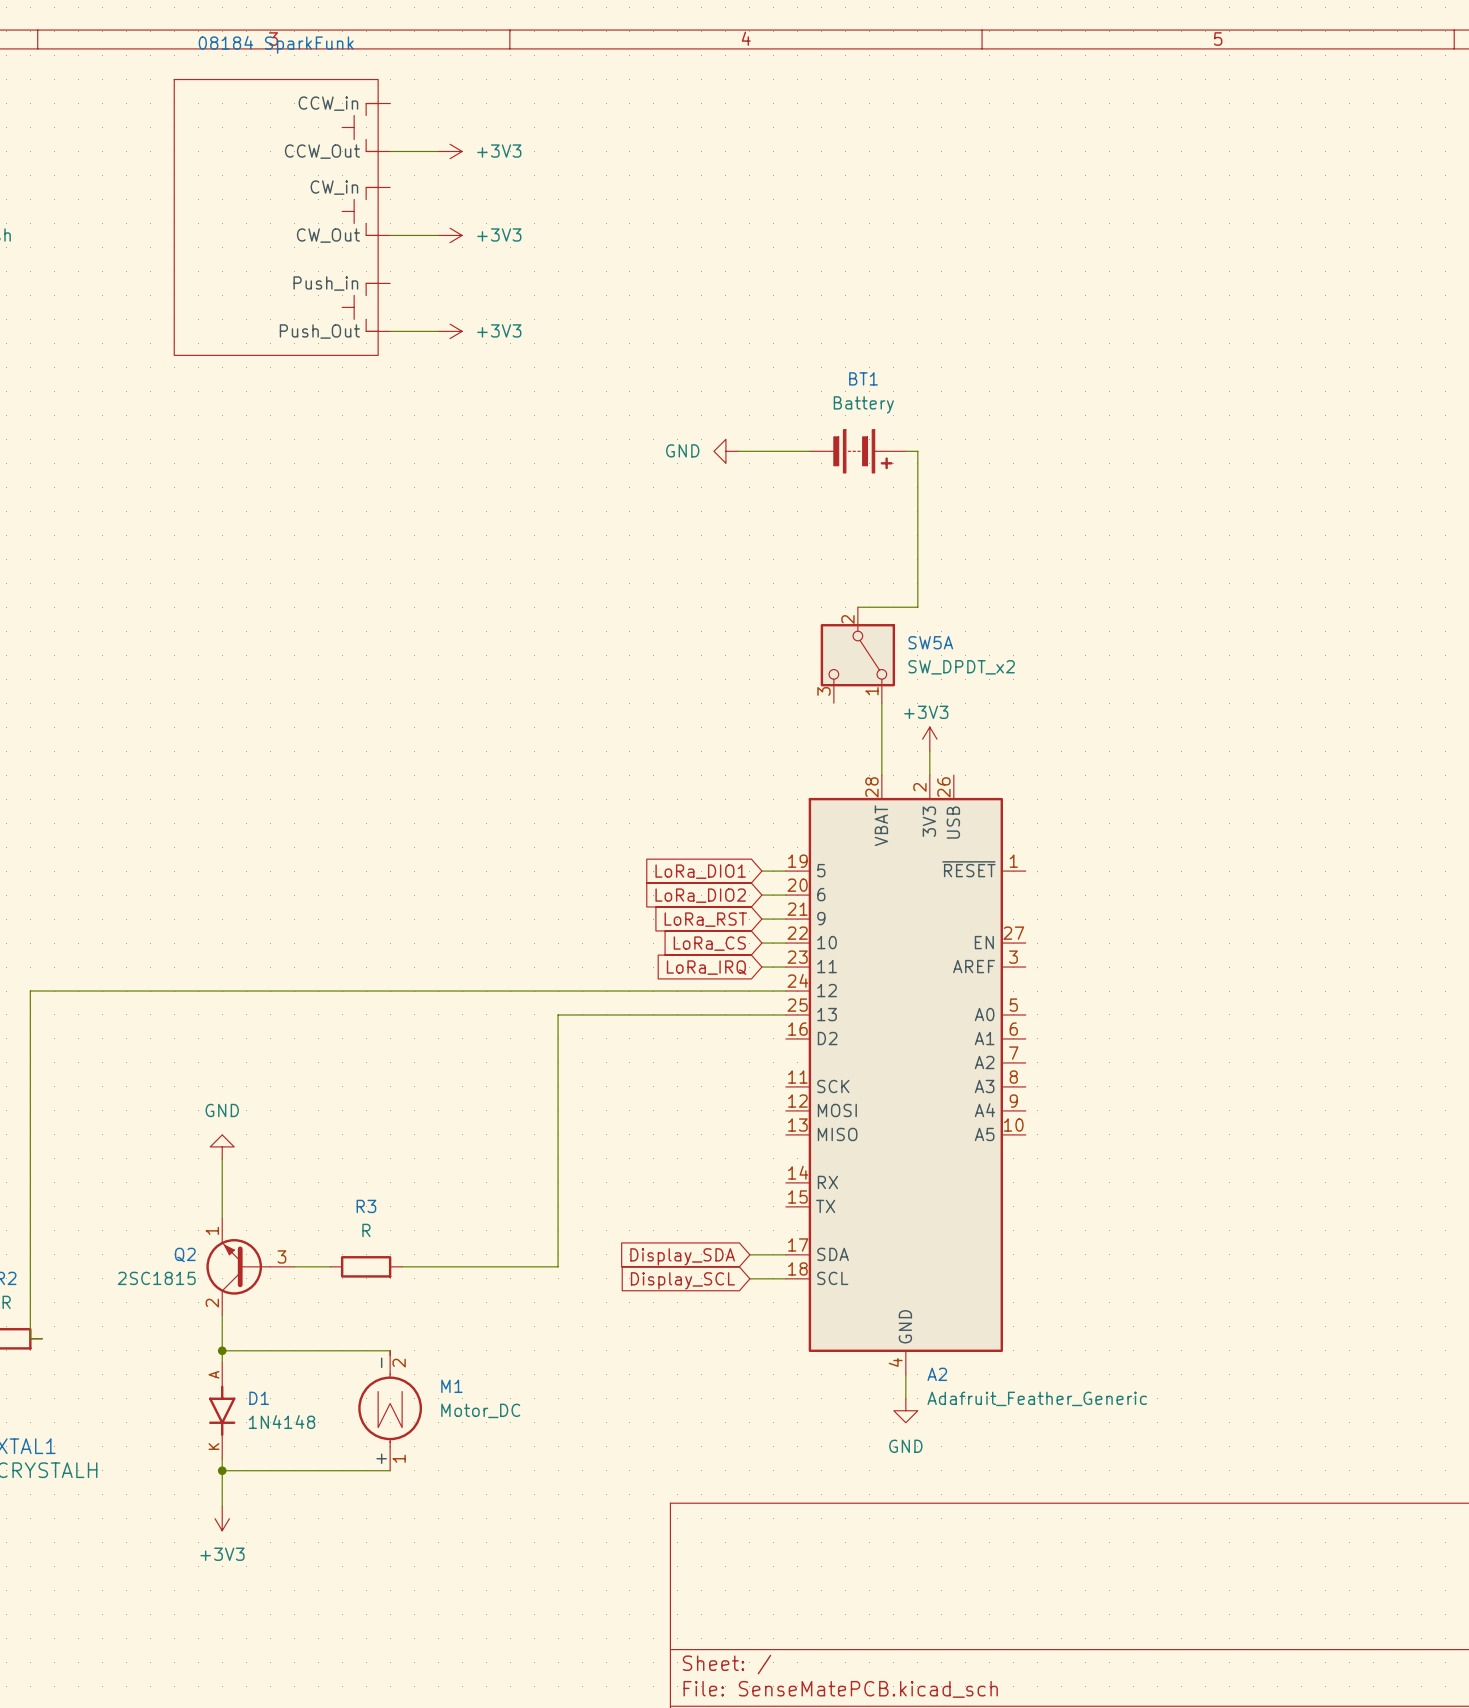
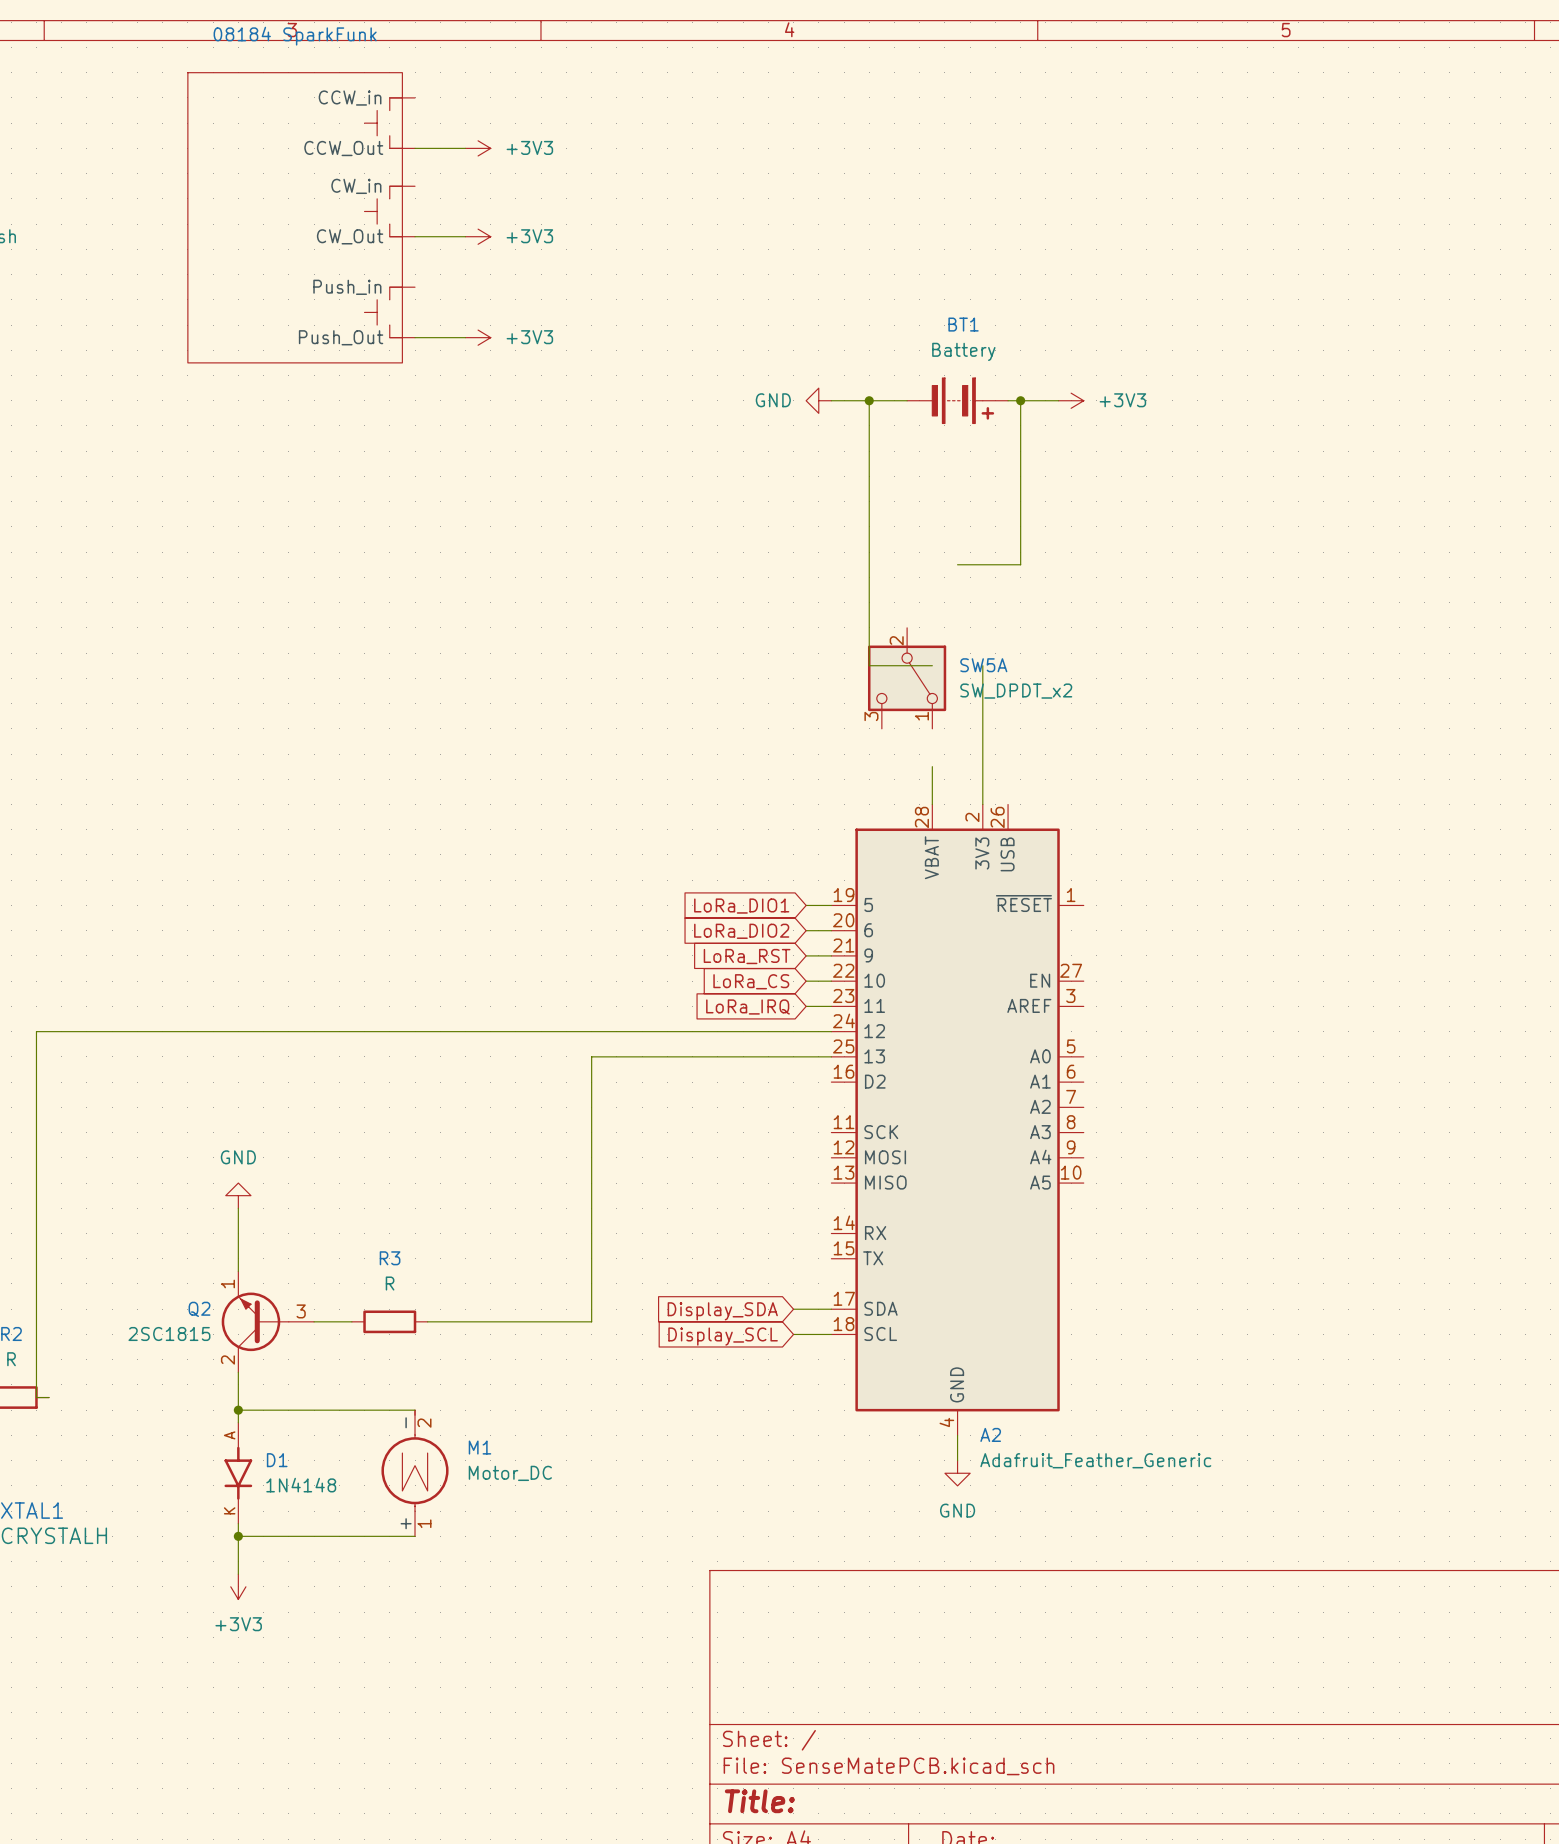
wire: none -> (869, 400) (869, 665) (932, 665)
junction: none -> (869, 400)
wire: none -> (1008, 400) (1058, 400)
wire: none -> (1020, 400) (1020, 564) (957, 564)
junction: none -> (1020, 400)
power symbol: none -> +3V3 (1071, 400)
power symbol position: GND (725, 451) -> GND (818, 400)
wire: (737, 451) (809, 451) -> (831, 400) (907, 400)
BT1 position: (857, 451) -> (957, 400)
wire: (905, 451) (917, 451) (917, 607) (857, 607) -> none
wire: none -> (982, 665) (982, 779)
wire: (881, 703) (881, 739) -> none
power symbol: +3V3 (929, 739) -> none

